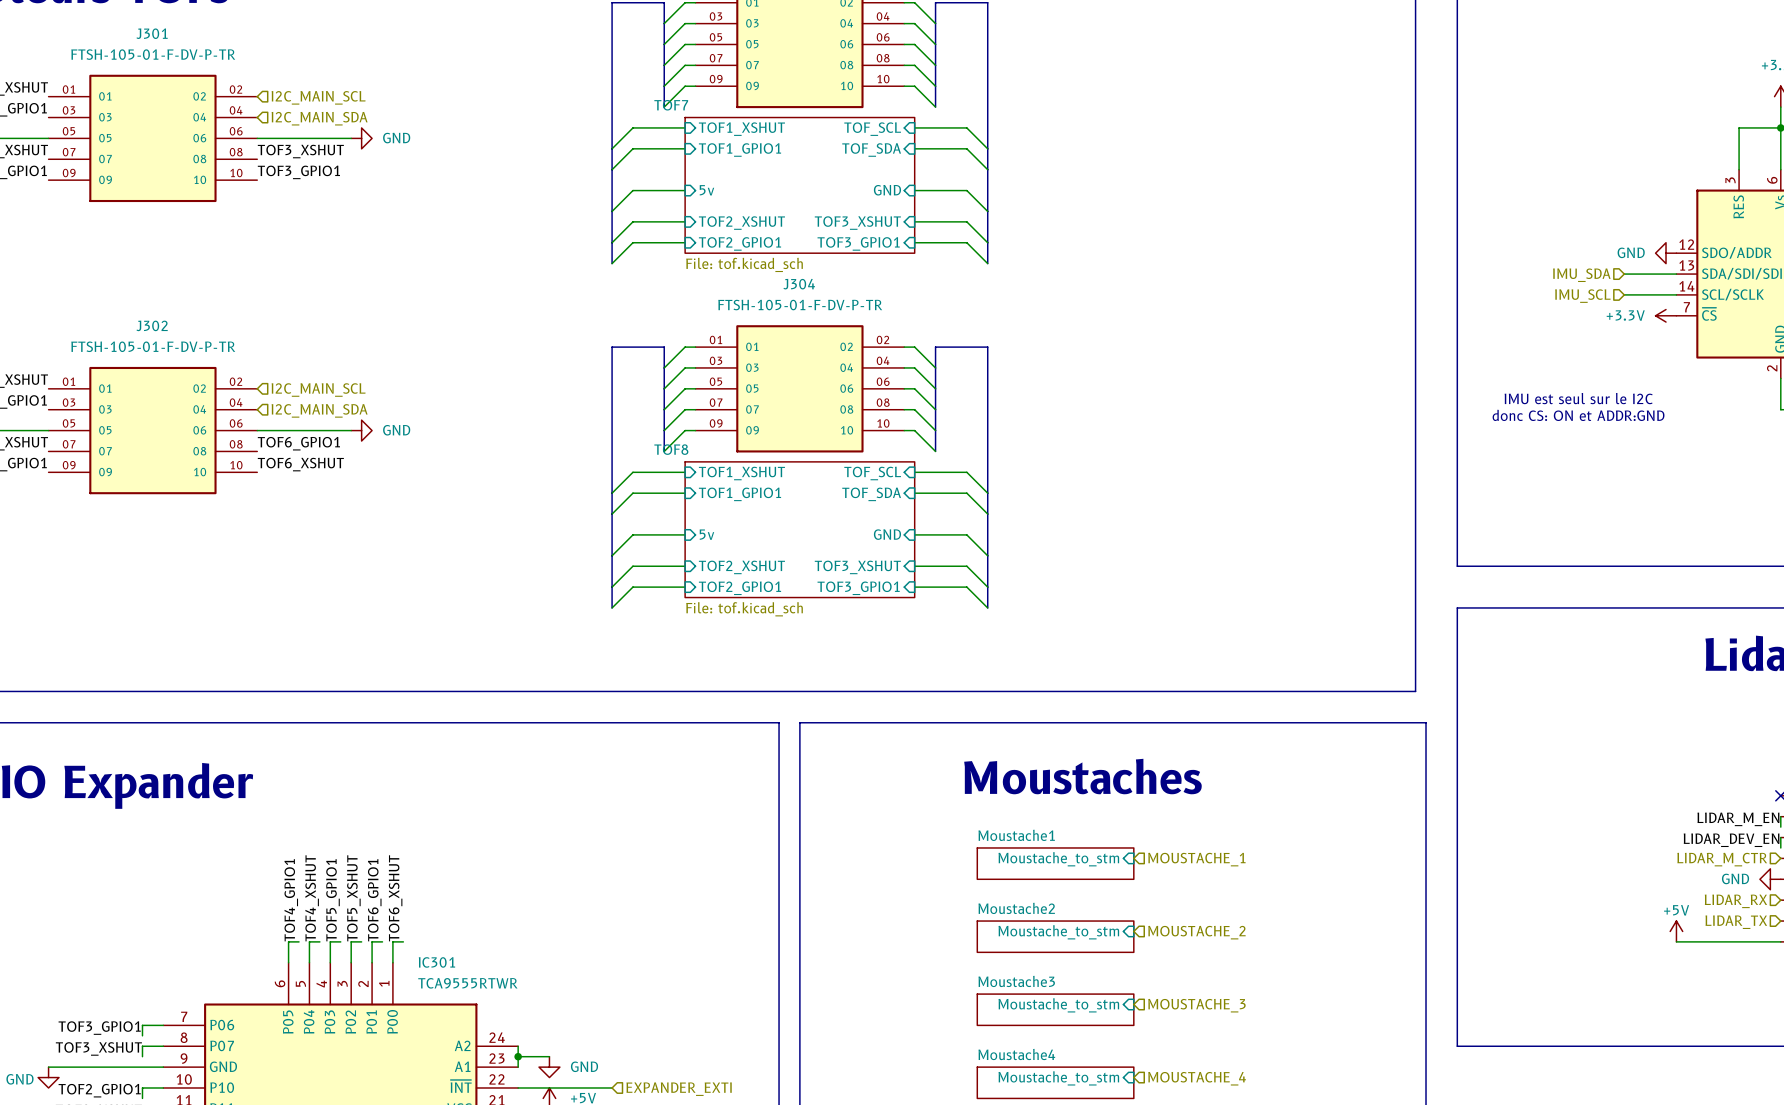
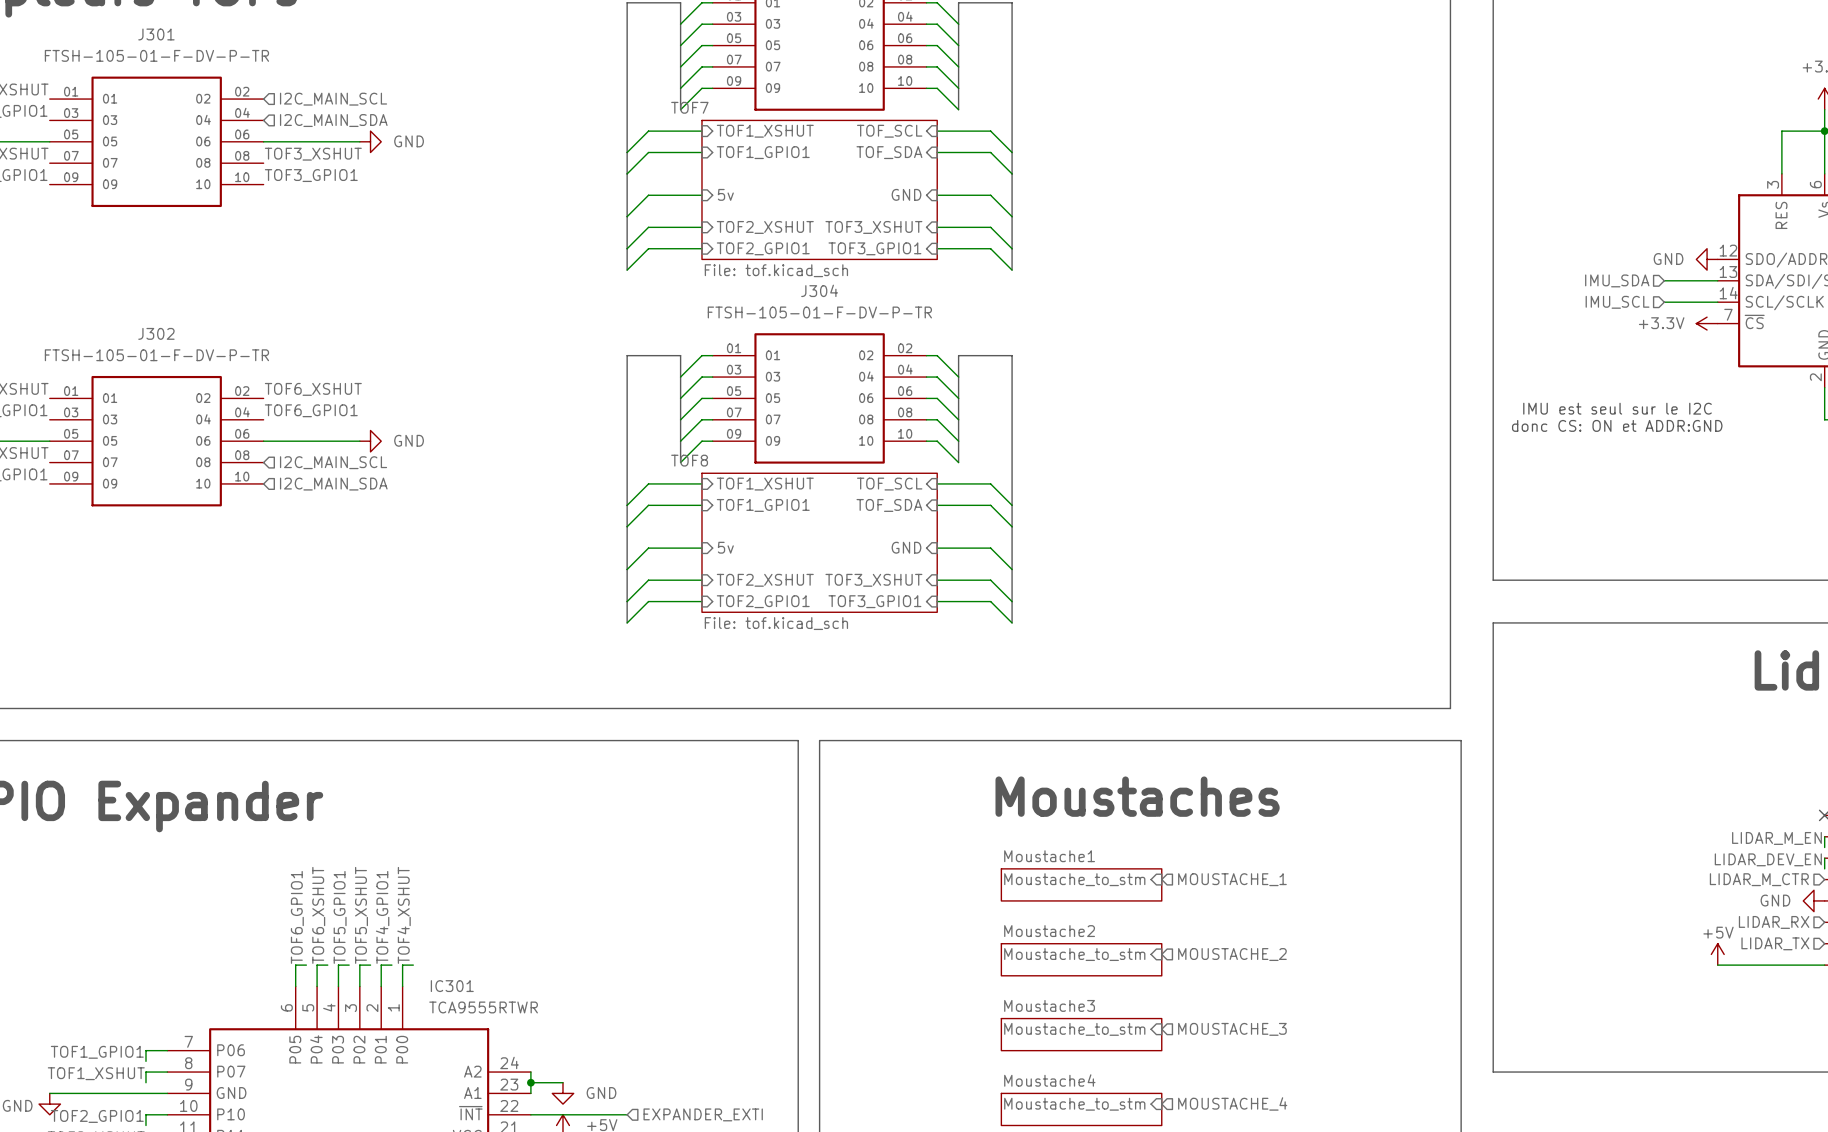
hierarchical label position: I2C_MAIN_SCL (318, 390) -> I2C_MAIN_SCL (333, 462)
hierarchical label position: I2C_MAIN_SDA (319, 410) -> I2C_MAIN_SDA (333, 484)
label position: TOF6_GPIO1 (298, 443) -> TOF6_GPIO1 (311, 410)
label position: TOF6_XSHUT (300, 464) -> TOF6_XSHUT (313, 389)
label: TOF4_XSHUT (312, 898) -> TOF6_XSHUT (318, 915)
label: TOF6_XSHUT (395, 898) -> TOF4_XSHUT (404, 915)
label: TOF4_GPIO1 (291, 900) -> TOF6_GPIO1 (297, 917)
label: TOF6_GPIO1 (374, 900) -> TOF4_GPIO1 (382, 917)
label: TOF3_GPIO1 (99, 1028) -> TOF1_GPIO1 (97, 1052)
label: TOF3_XSHUT (98, 1048) -> TOF1_XSHUT (96, 1073)

